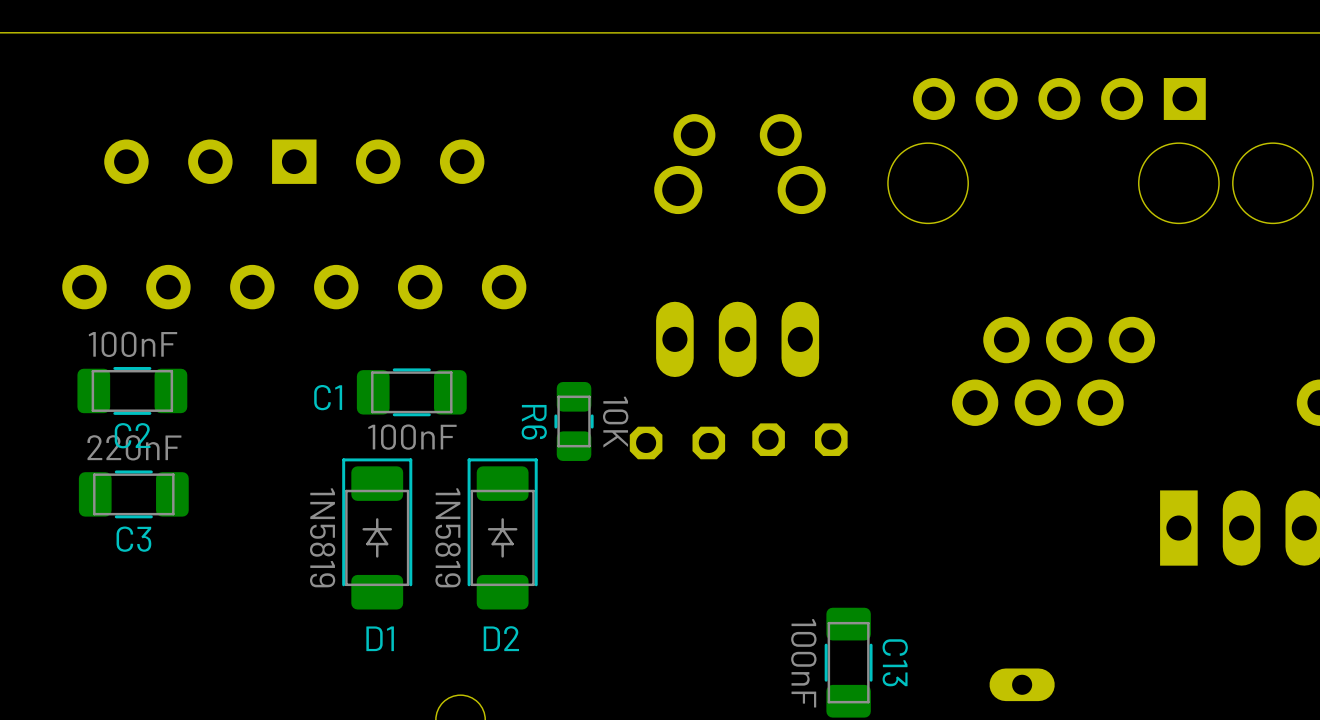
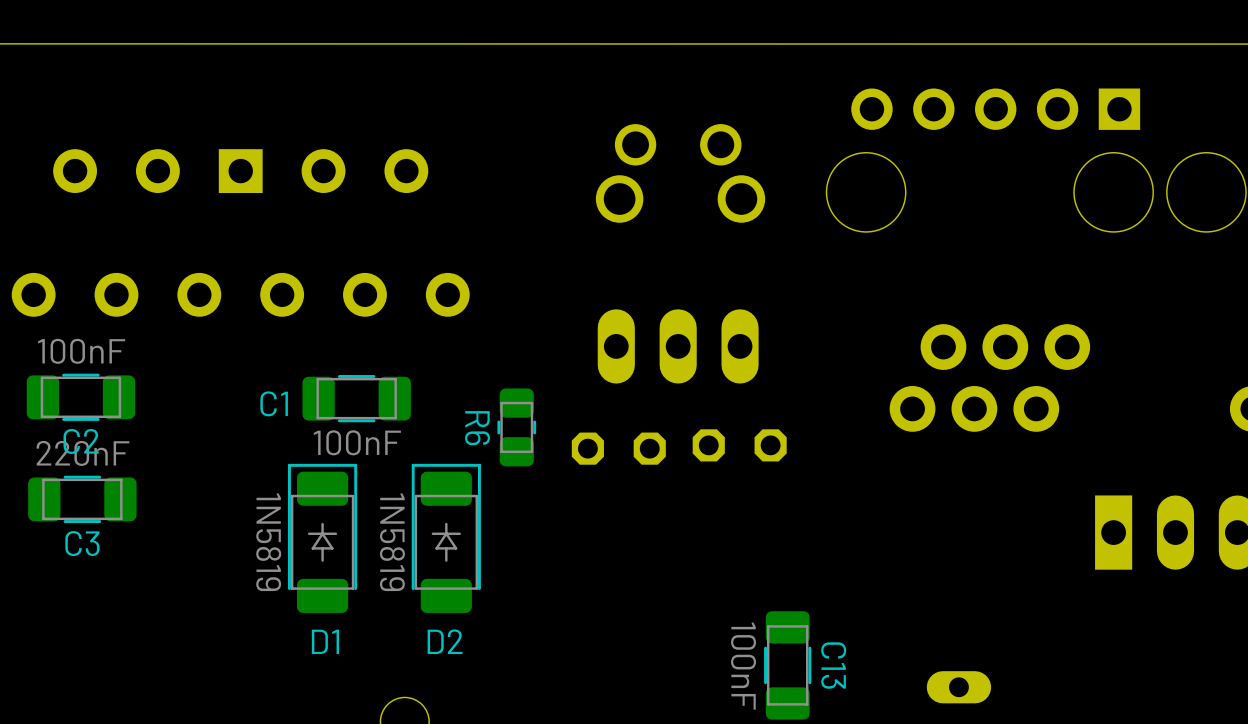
R6 value: 10K (615, 422) -> none

